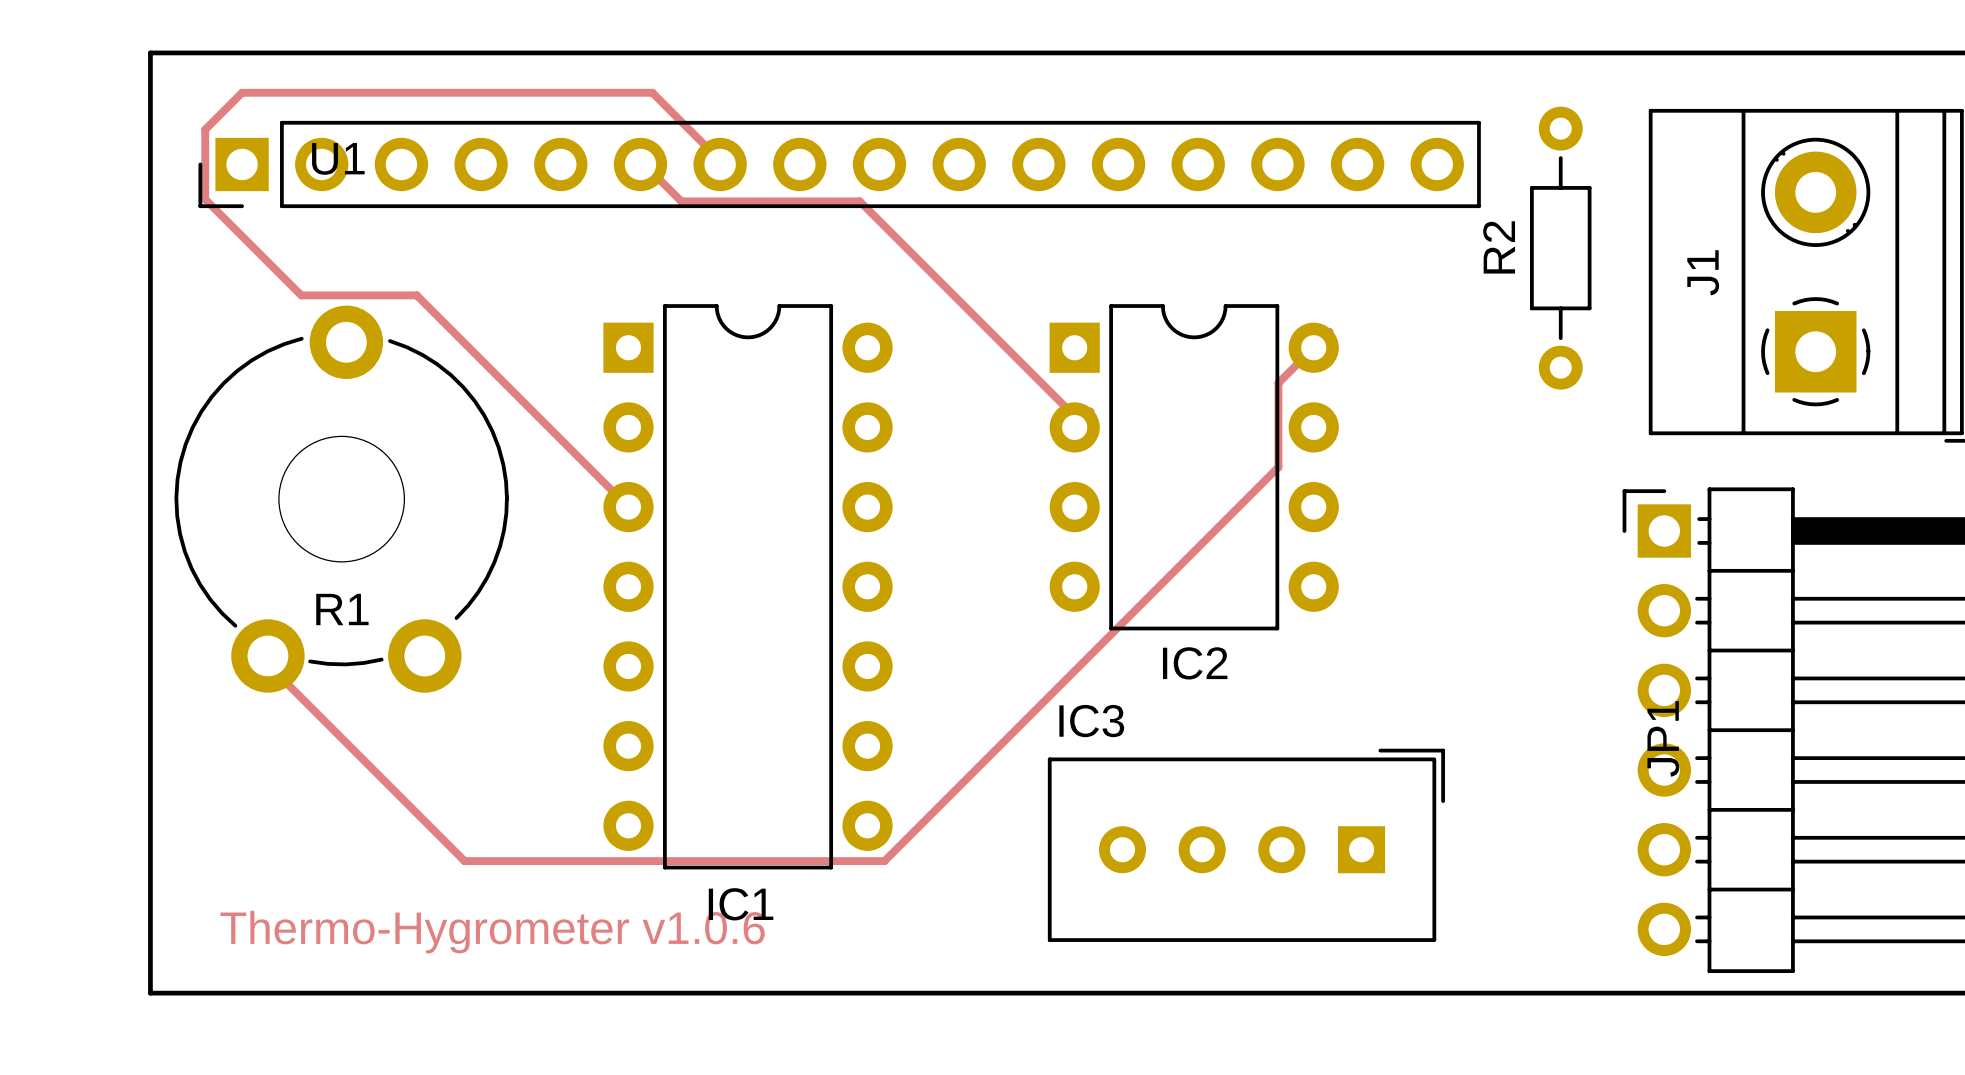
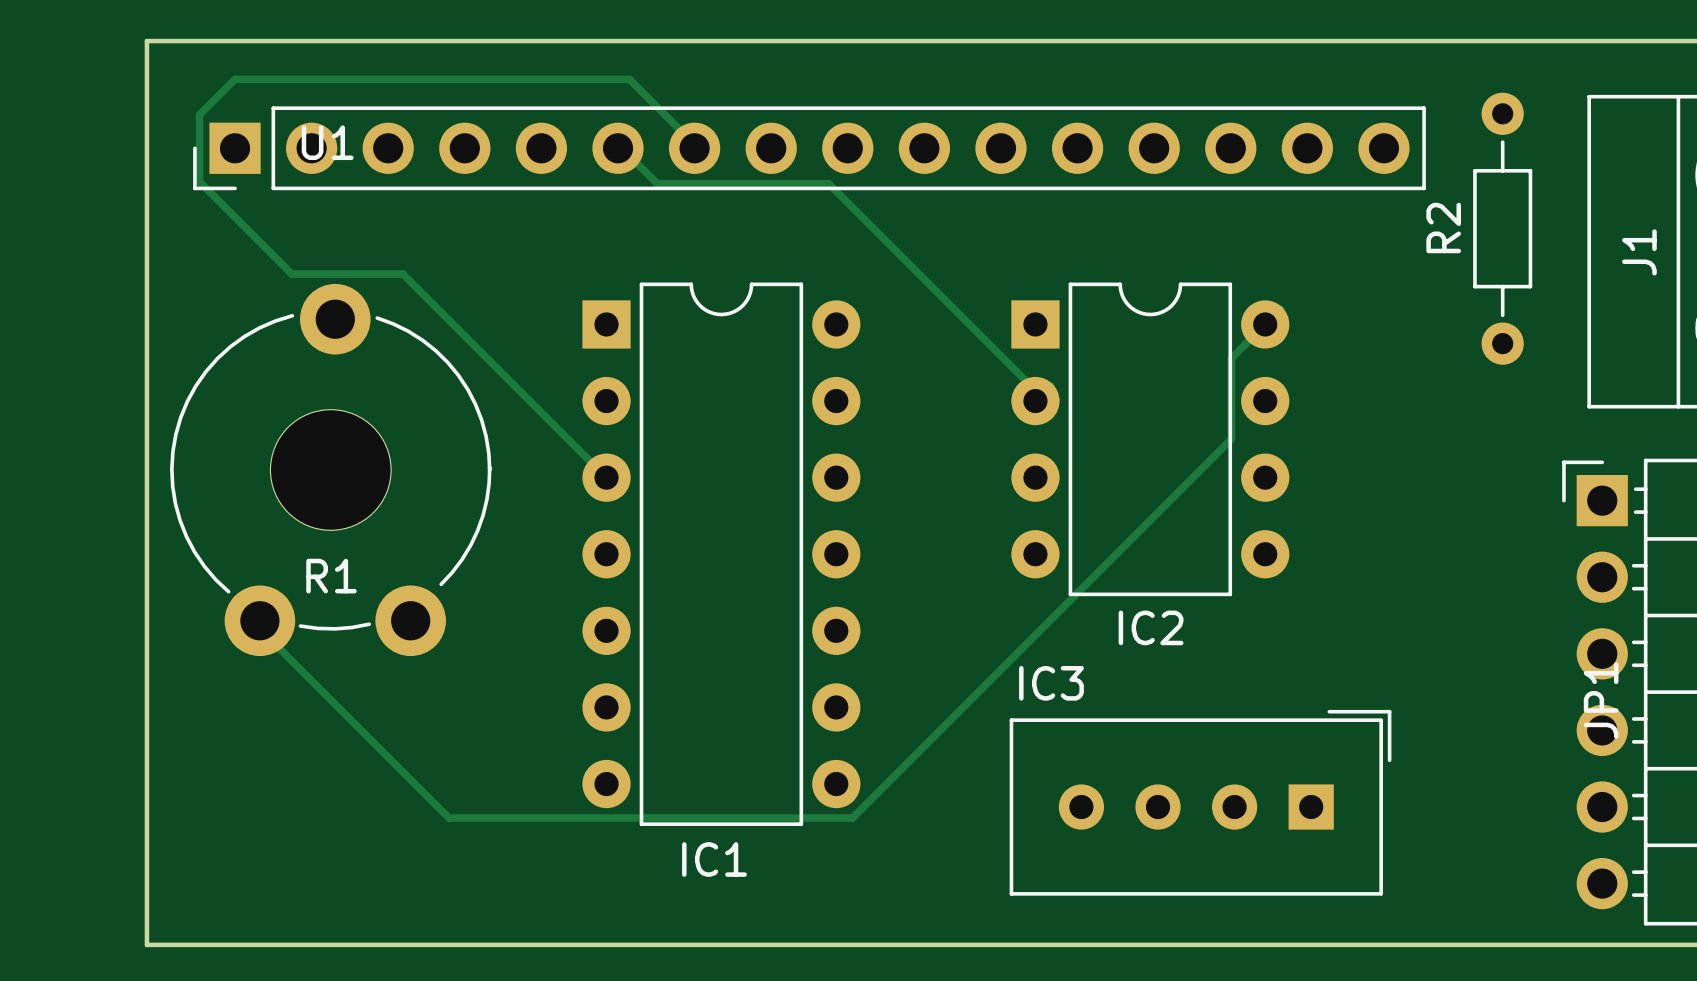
text: Thermo-Hygrometer v1.0.6 (492, 932) -> none

